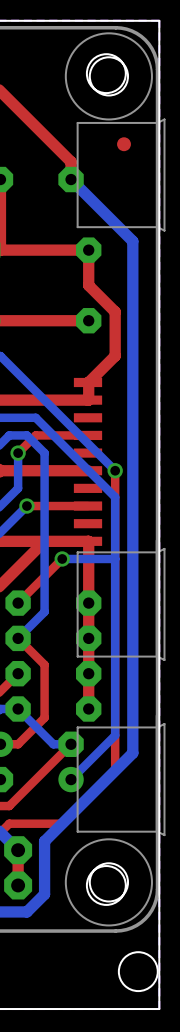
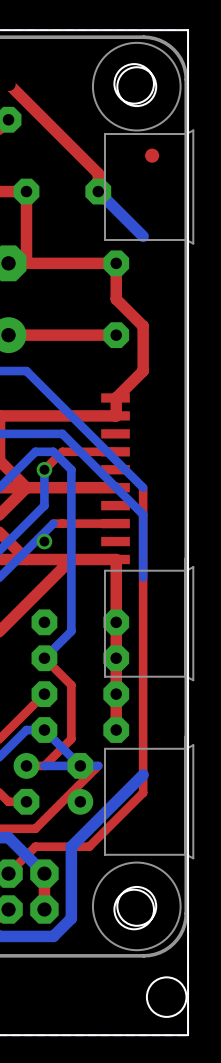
bottom track: (115, 223) (132, 241) (132, 753) (44, 841) -> (143, 774) (71, 846) (71, 864)
via: (115, 470) -> none
via position: (26, 506) -> (44, 541)
top track: (62, 558) (18, 603) -> none
bottom track: (62, 558) (115, 558) (115, 735) (71, 779) -> none
via: (62, 558) -> none
bottom track: none -> (80, 765) (44, 765)
part position: (71, 761) -> (80, 783)

